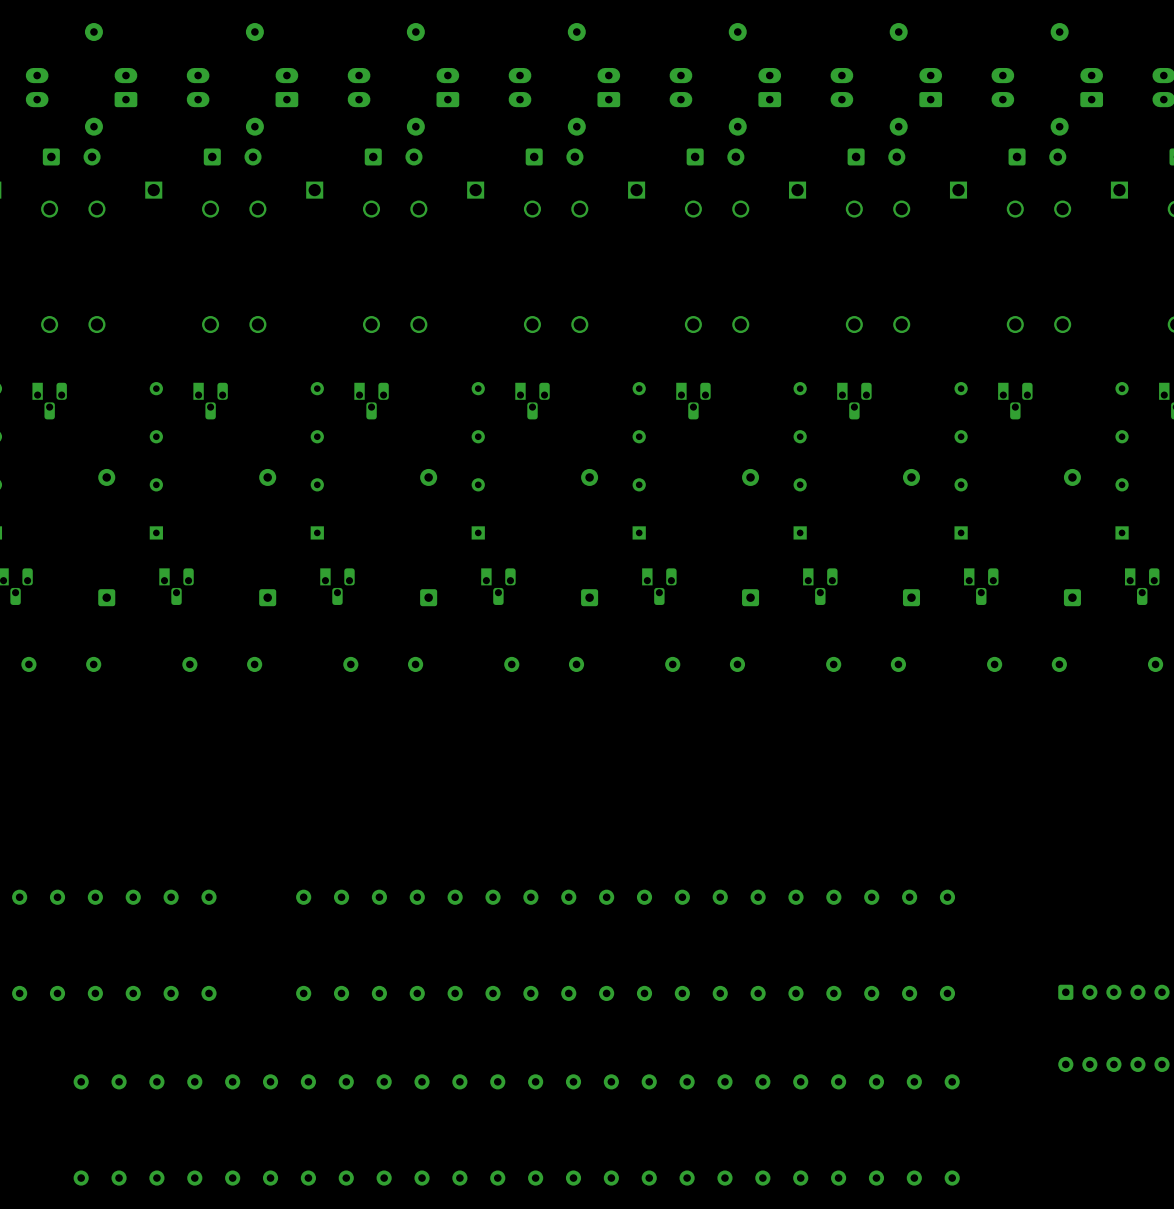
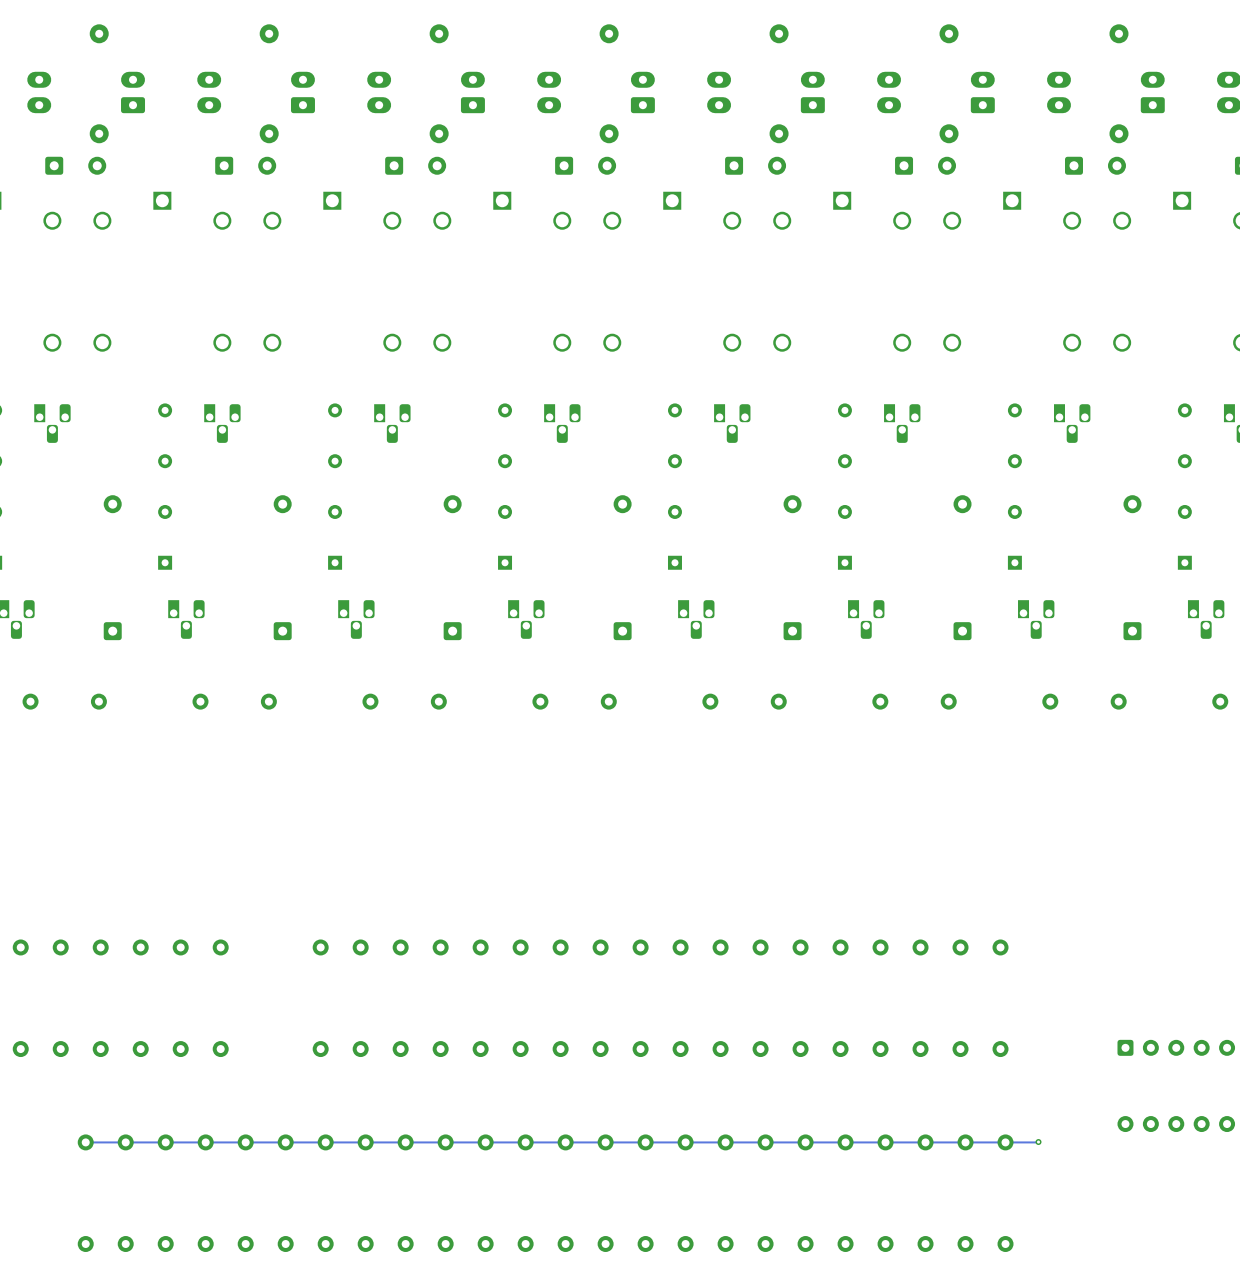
track: none -> (1038, 1142) (85, 1142)
via: none -> (1038, 1142)

